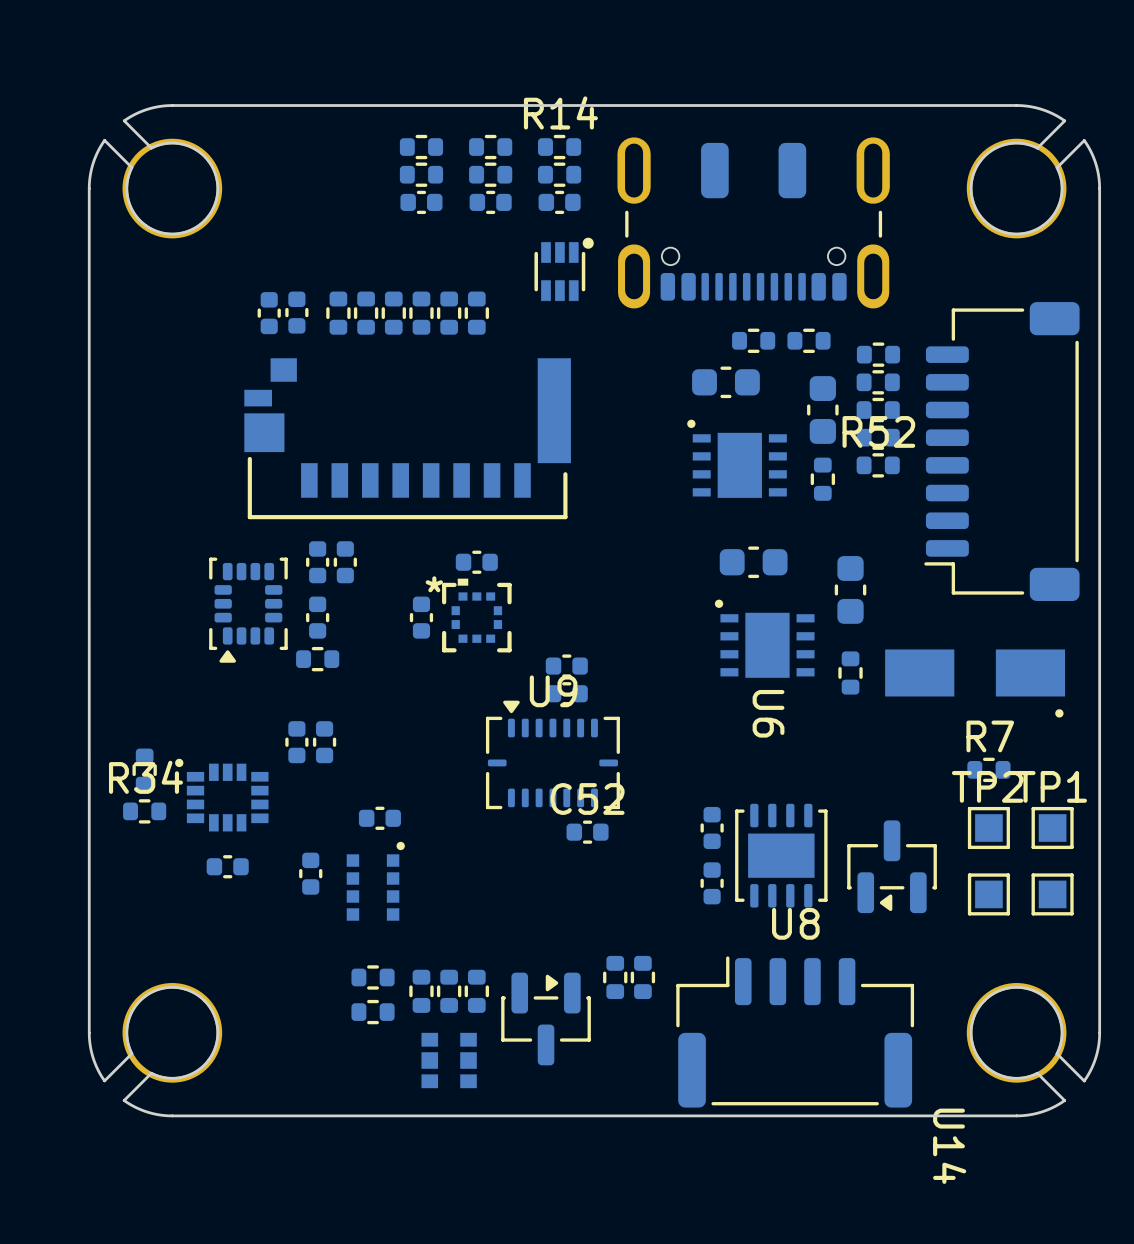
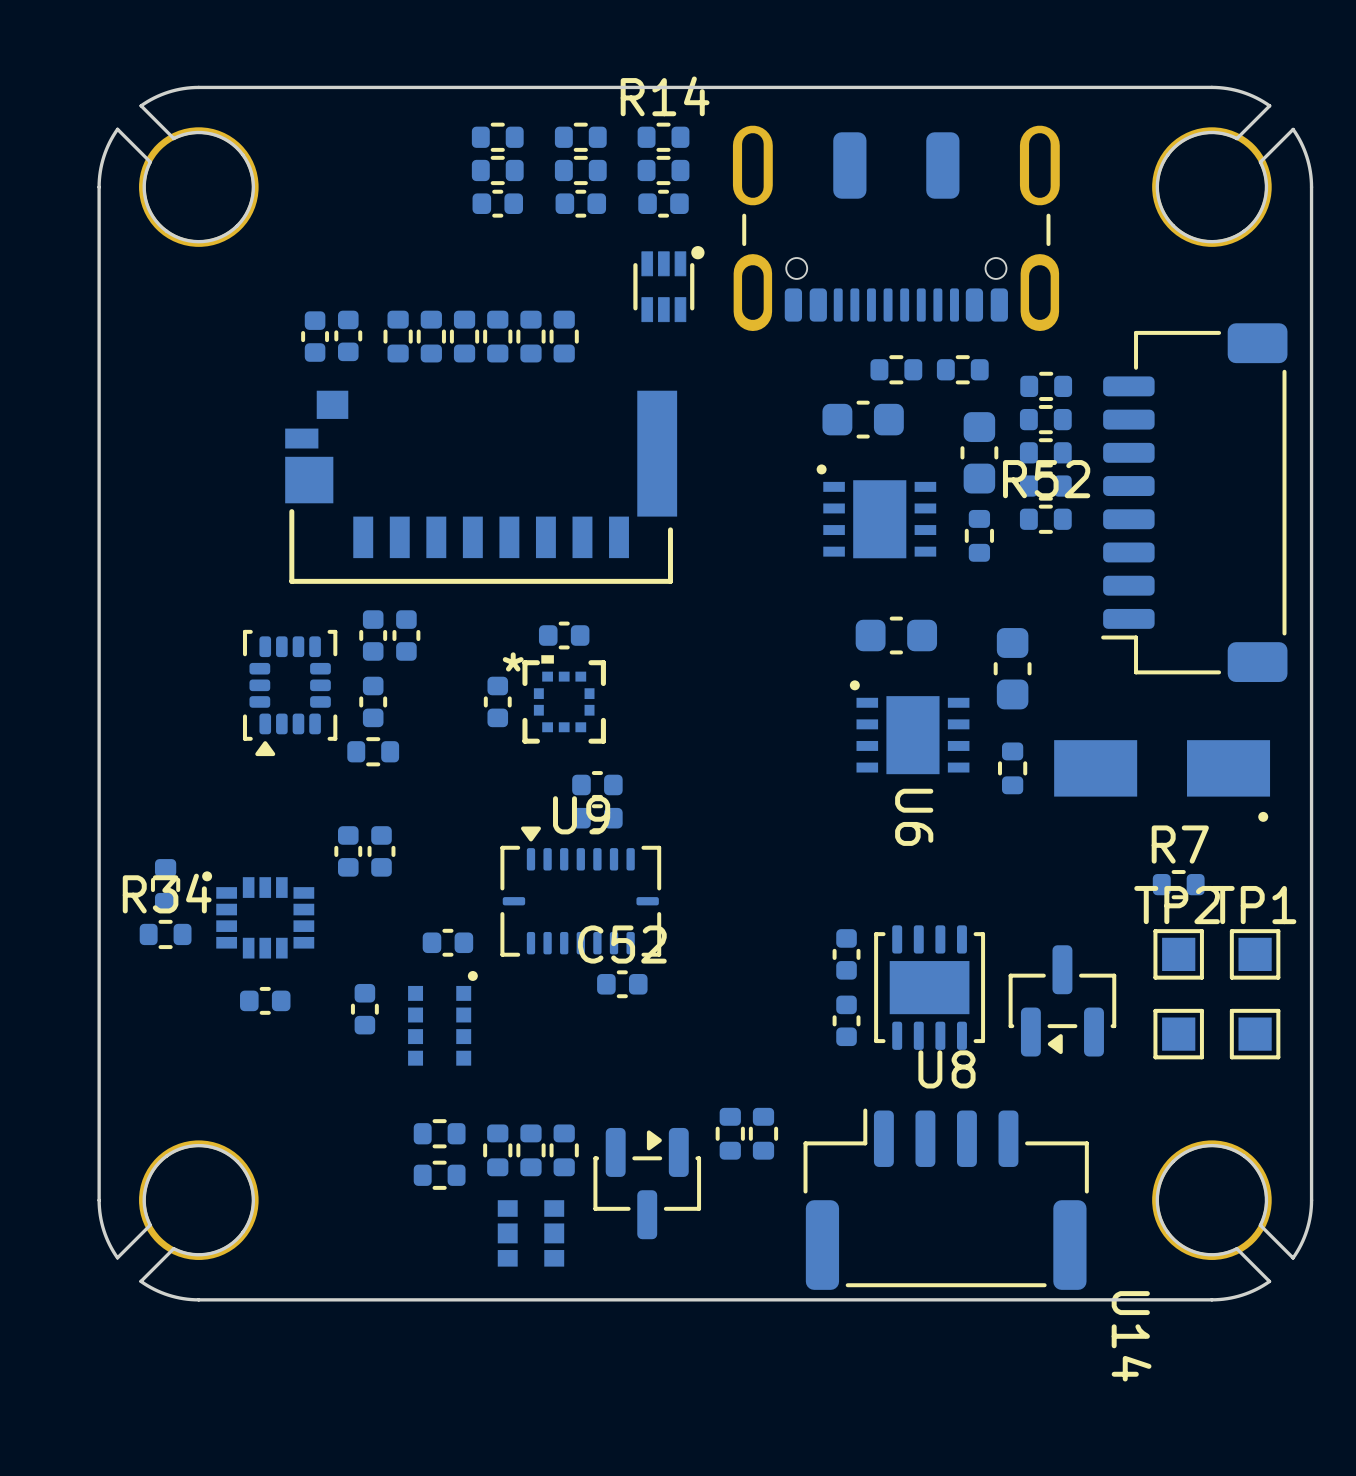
part: (566, 666) -> none
part: none -> (597, 784)
part: (566, 693) -> none
part: none -> (597, 818)
U9 position: (552, 754) -> (580, 891)
C52 position: (587, 832) -> (622, 984)

